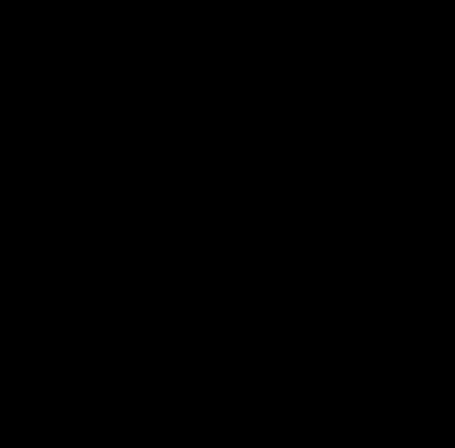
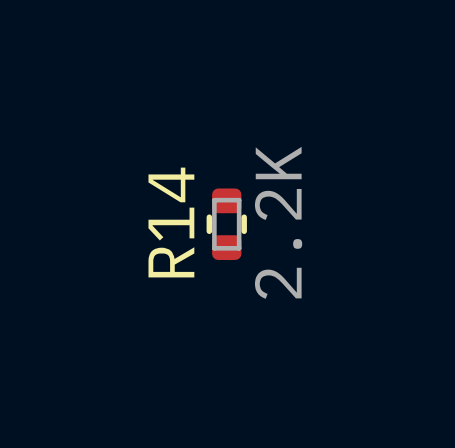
R14: none -> 2.2K (226, 224)

